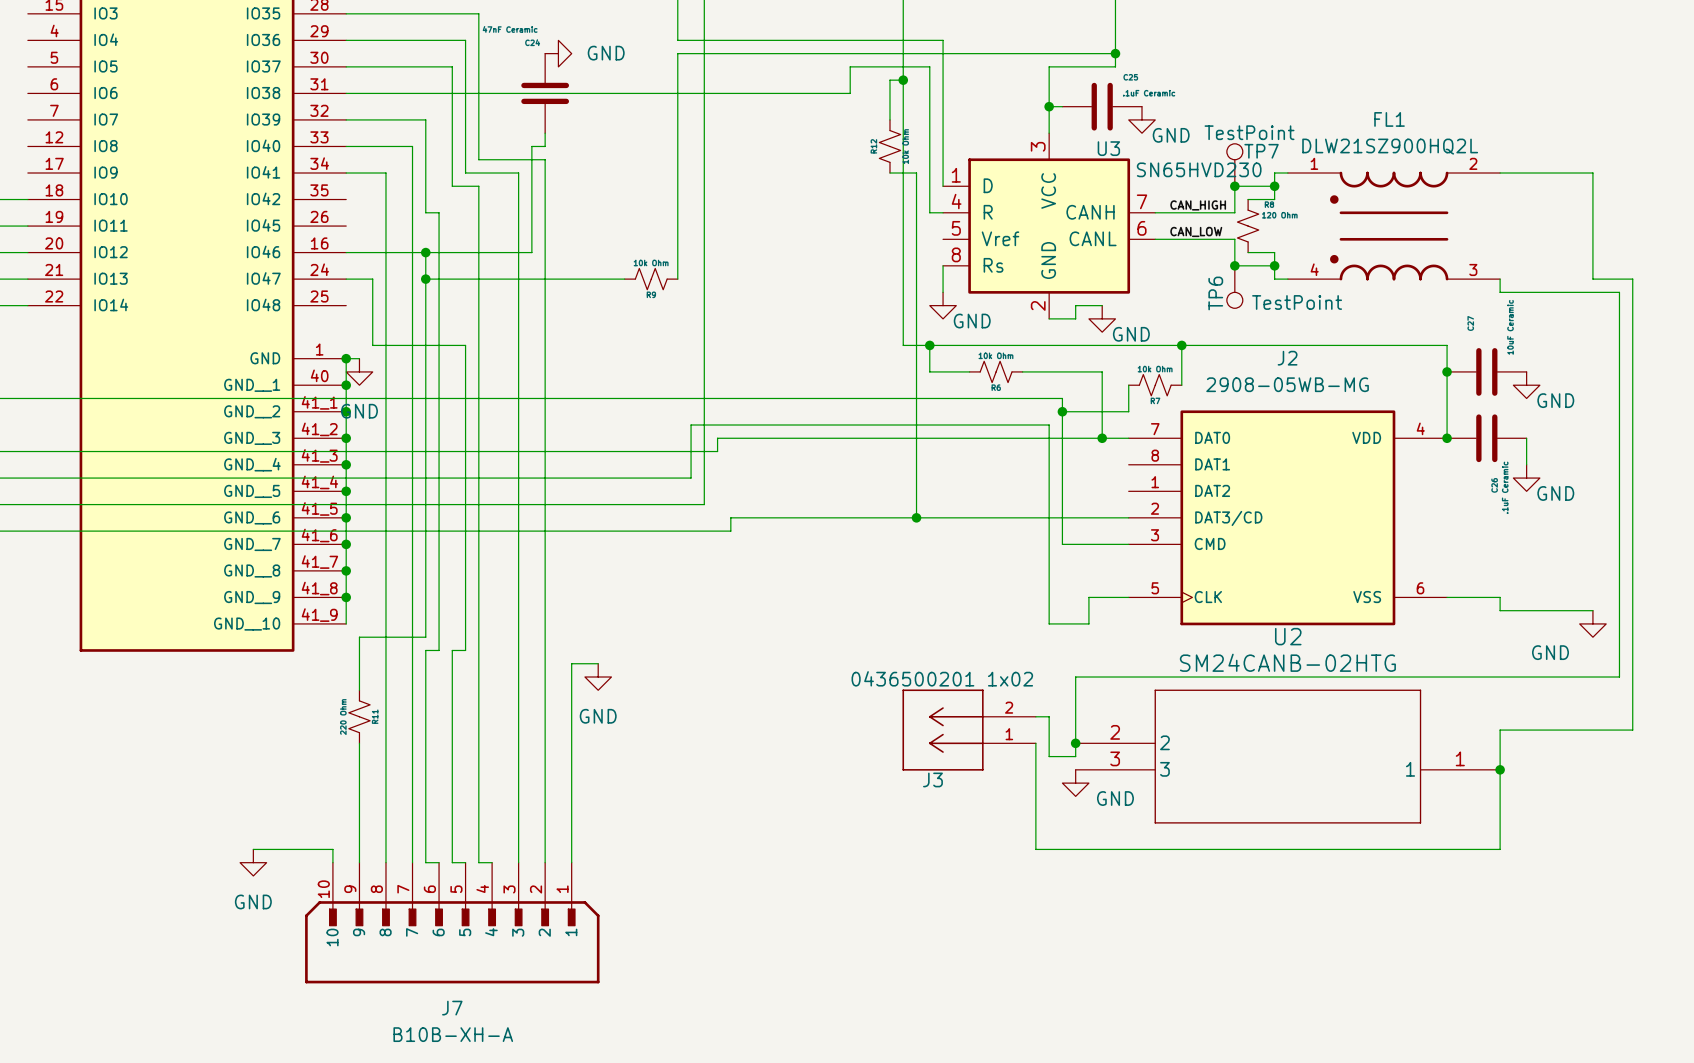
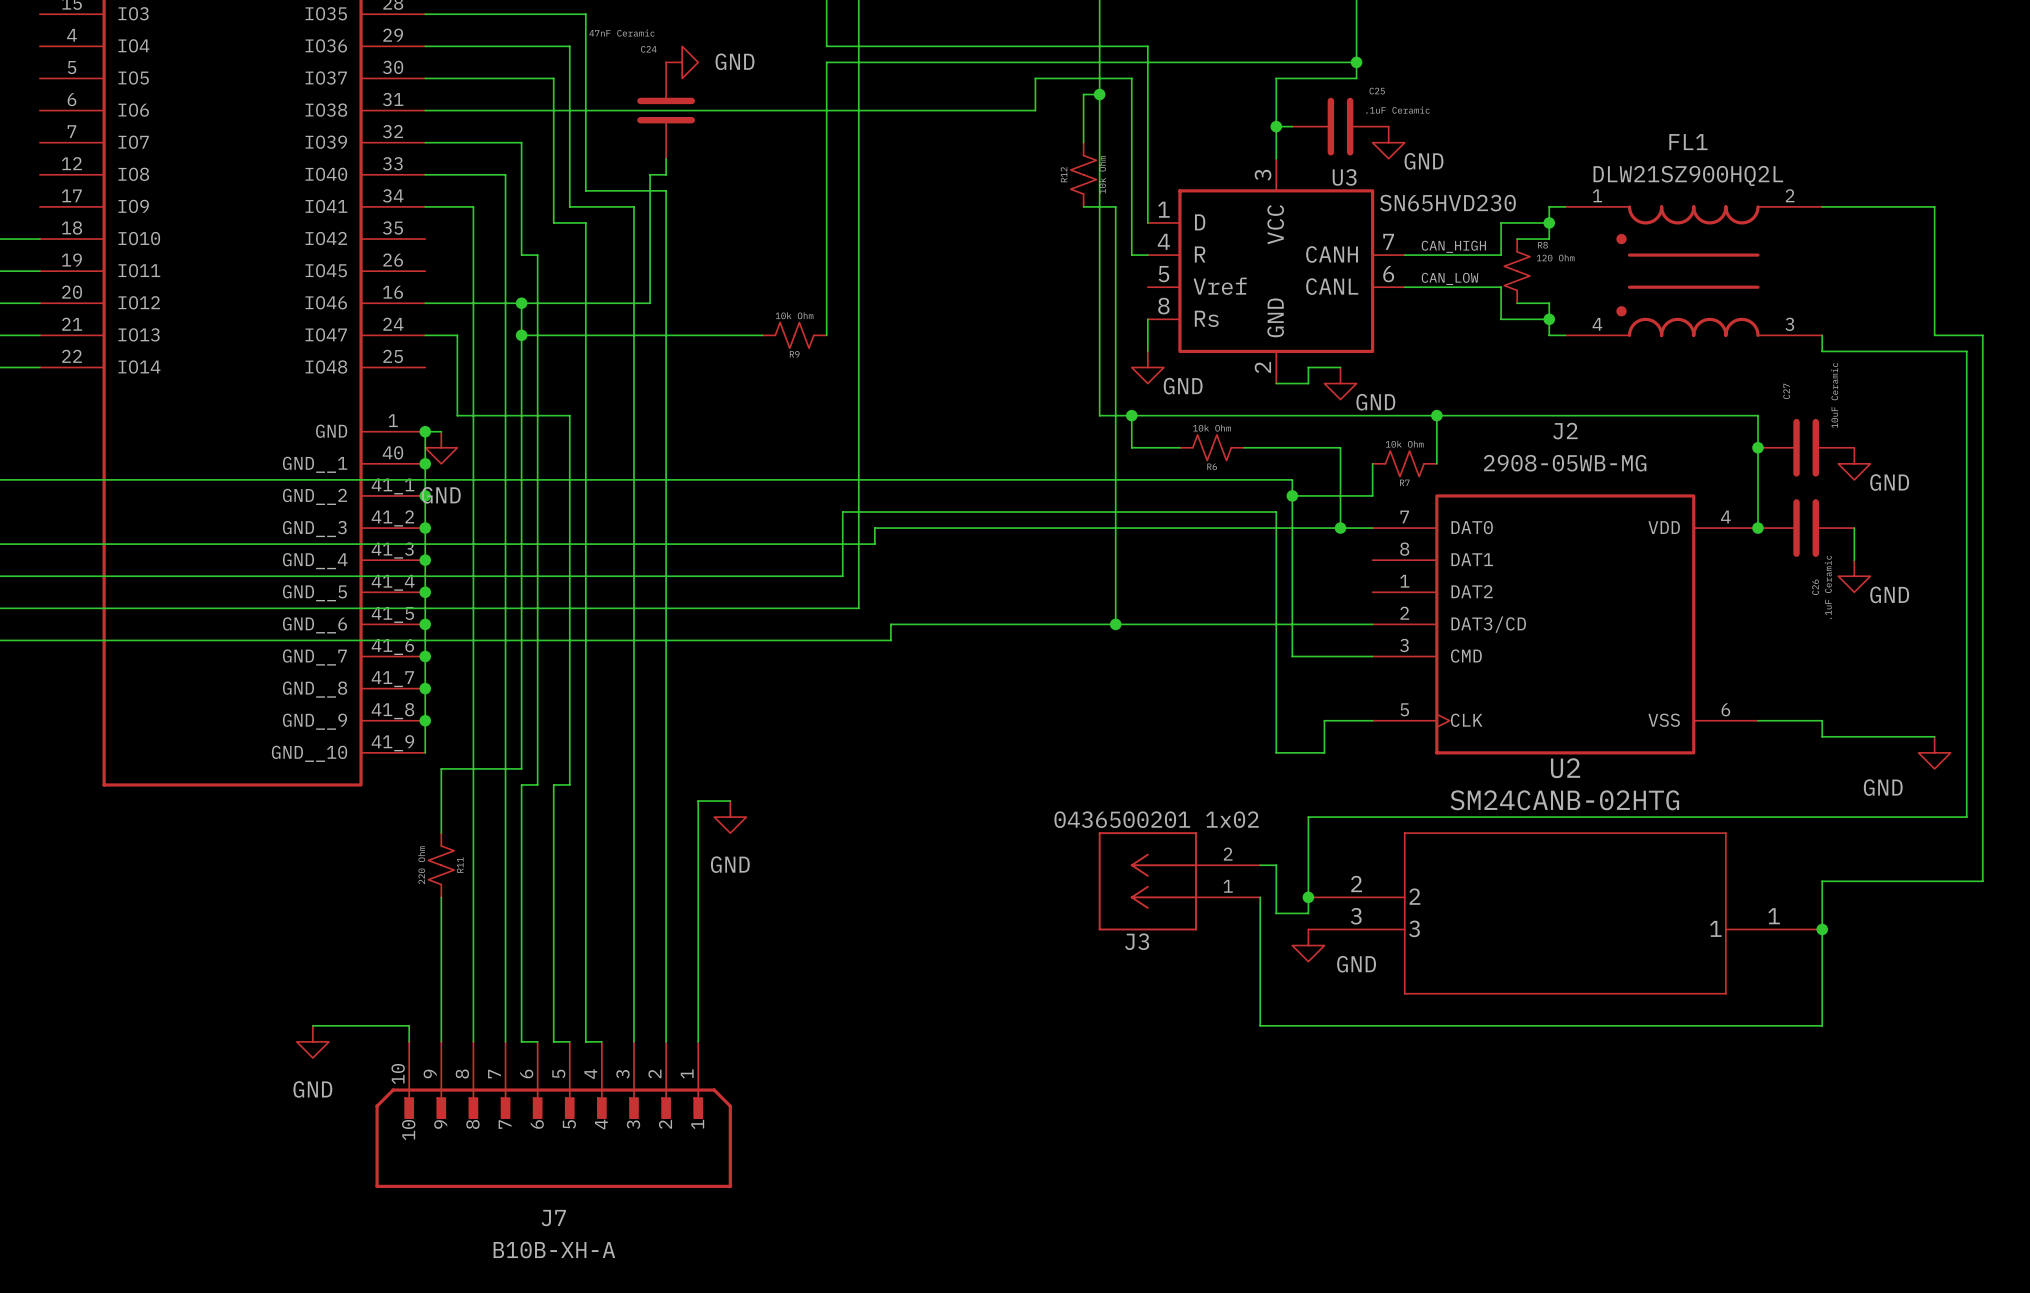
TP7: TestPoint (1234, 165) -> none
junction: (1234, 186) -> none
junction: (1234, 265) -> none
TP6: TestPoint (1234, 287) -> none

